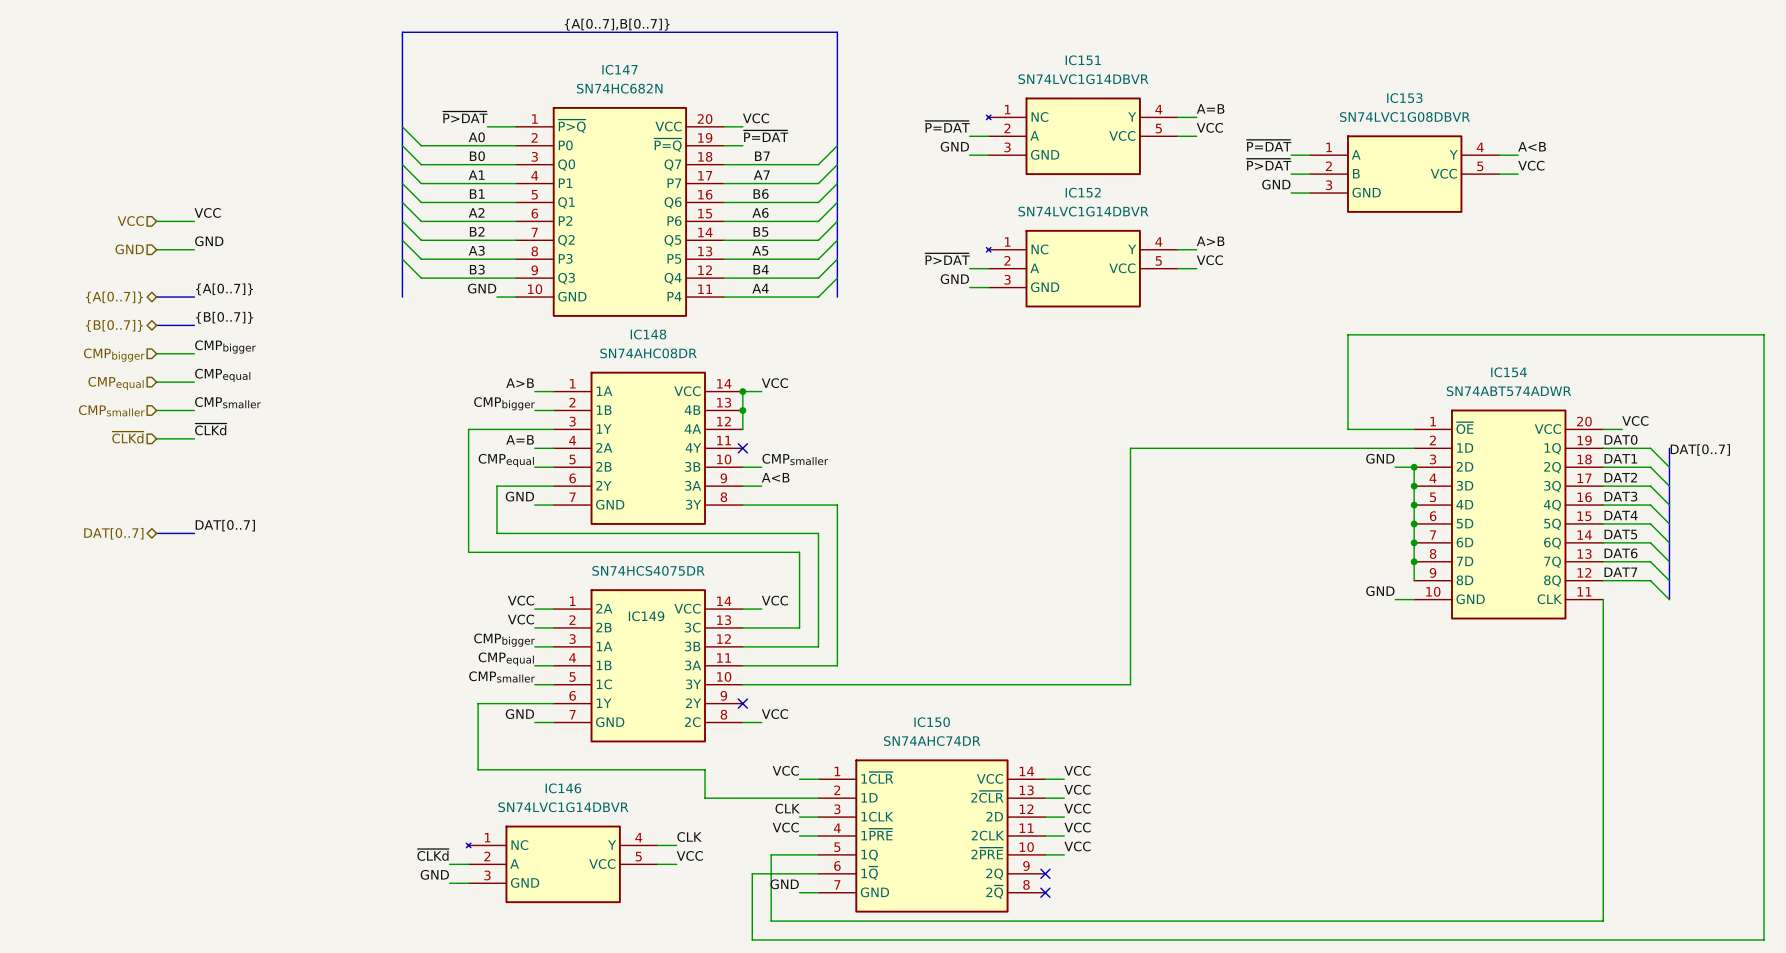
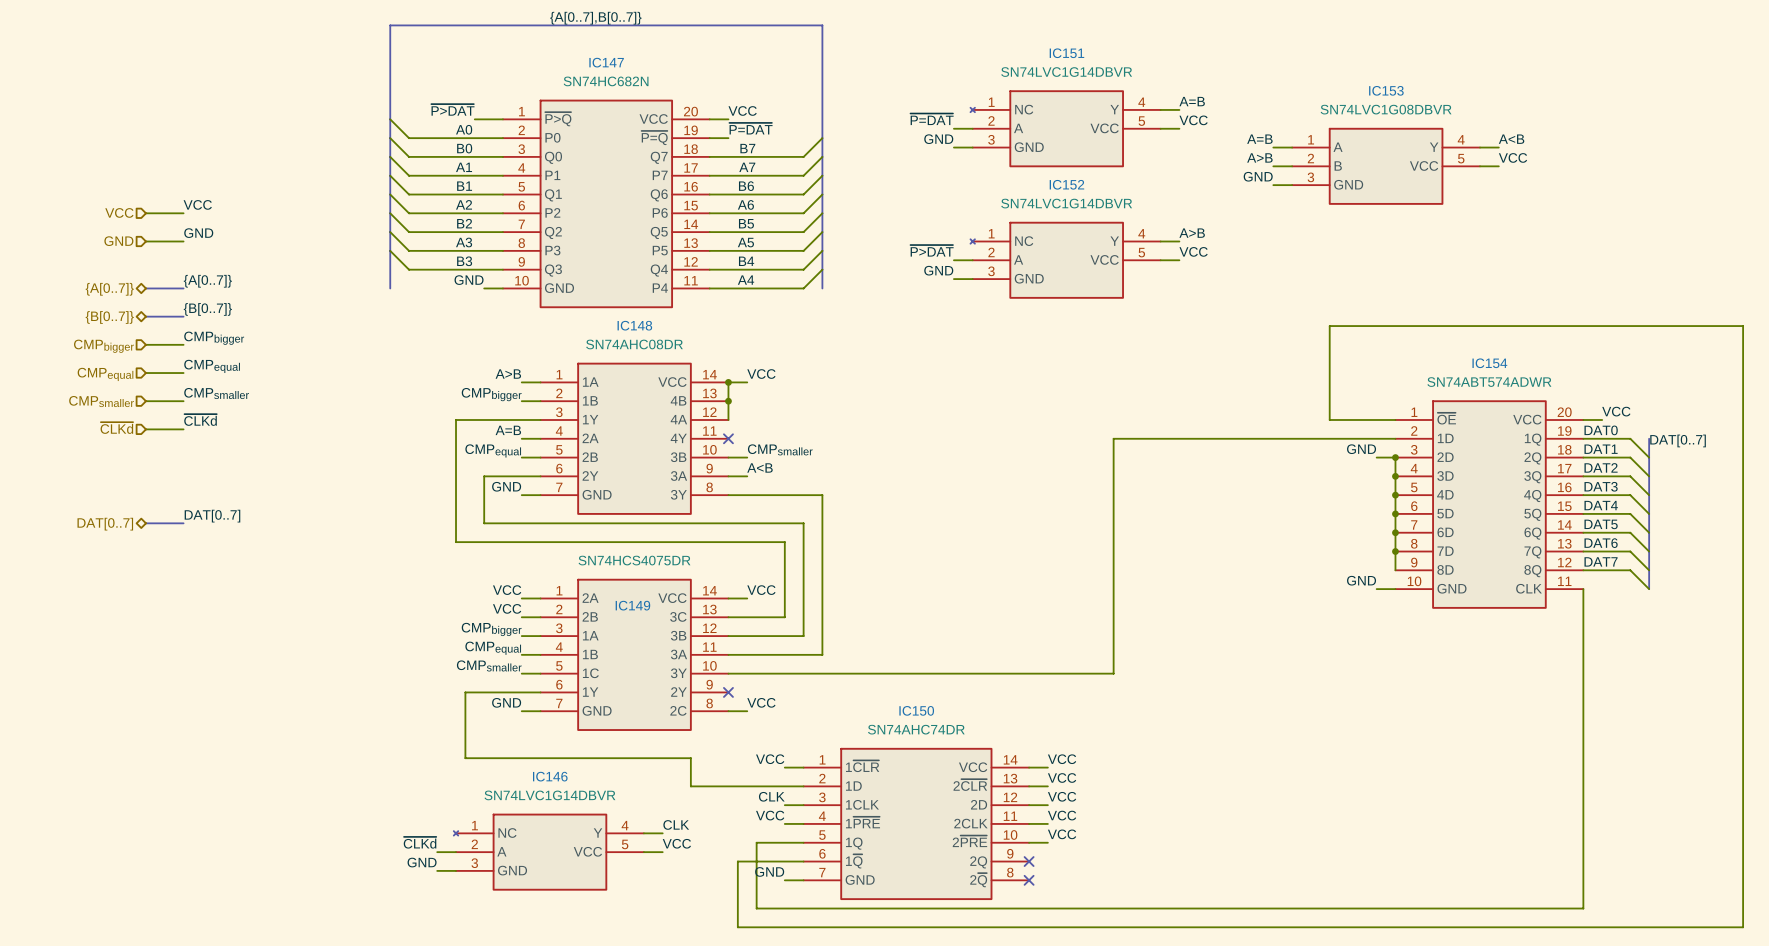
label: ~{P=DAT} (1269, 145) -> A=B (1259, 139)
label: ~{P>DAT} (1269, 164) -> A>B (1259, 157)

